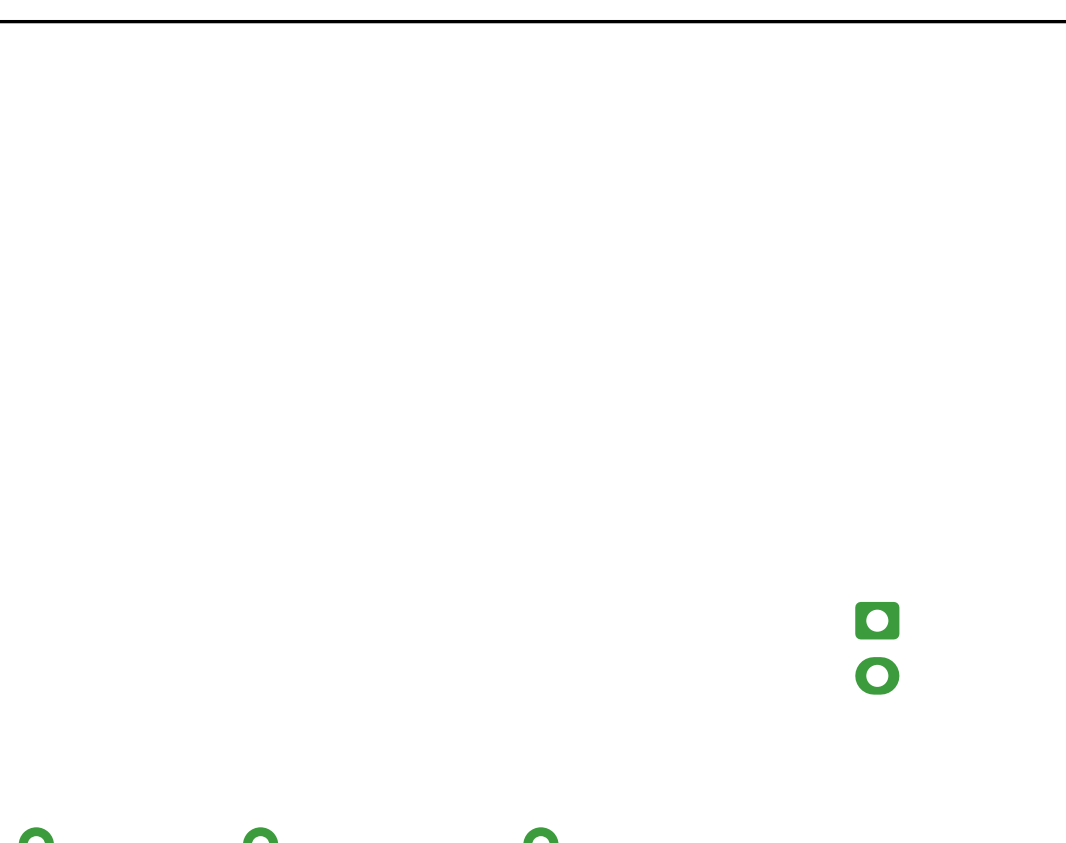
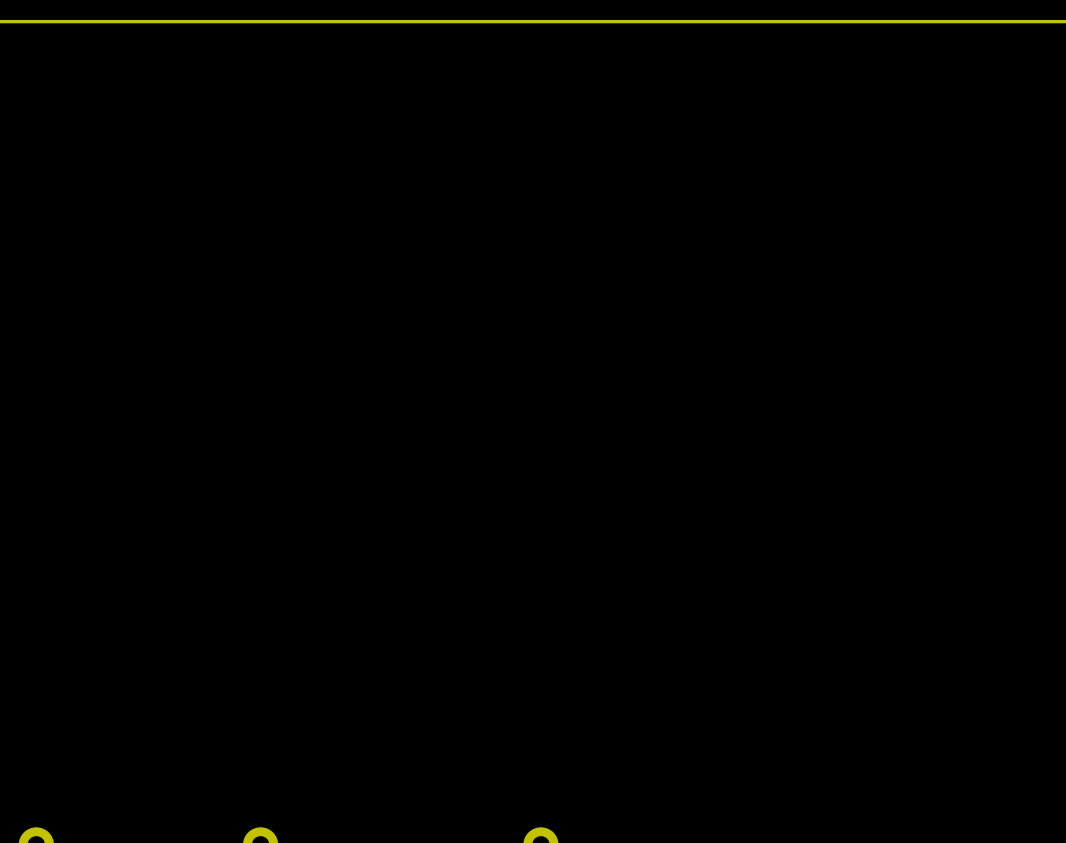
part: (877, 648) -> none

